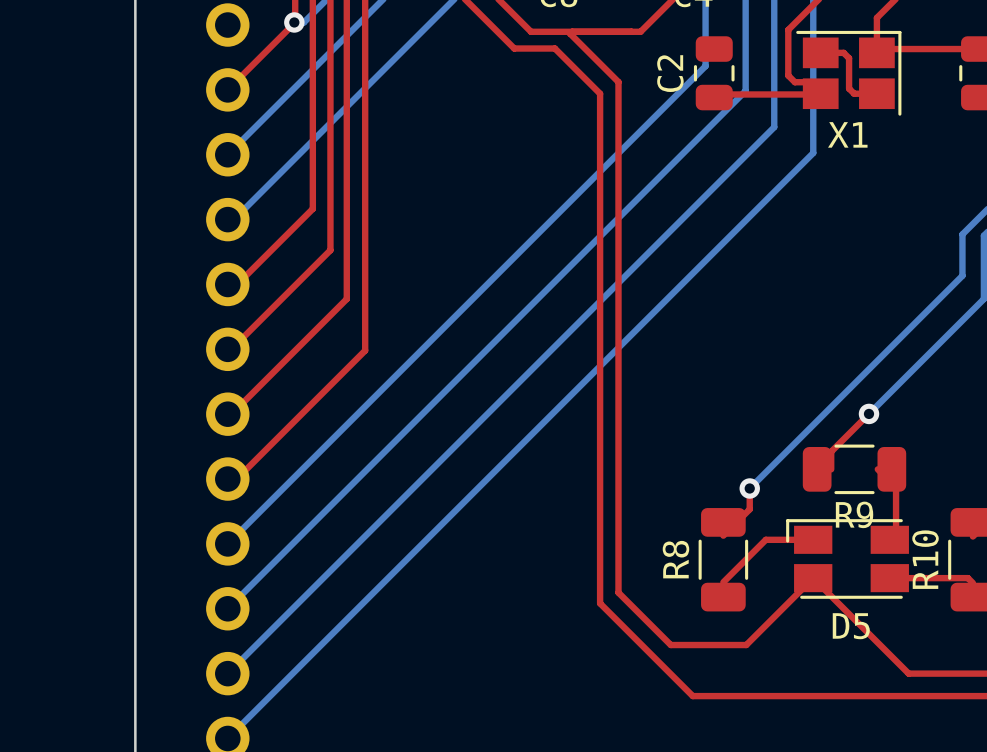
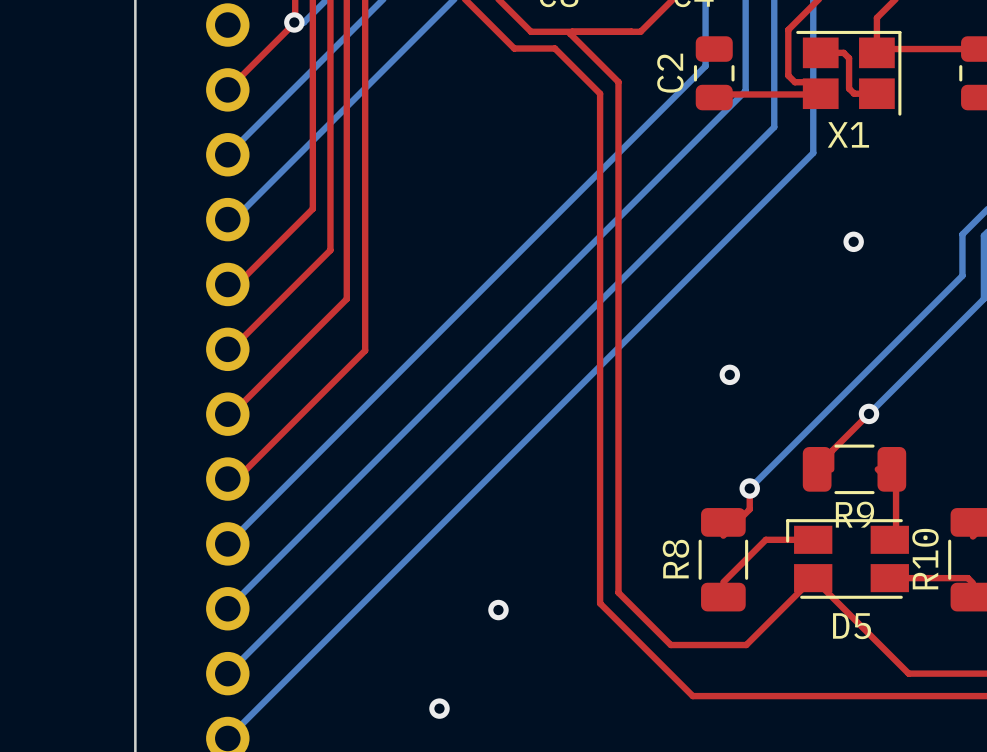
via: none -> (853, 241)
via: none -> (729, 374)
via: none -> (498, 610)
via: none -> (439, 708)

